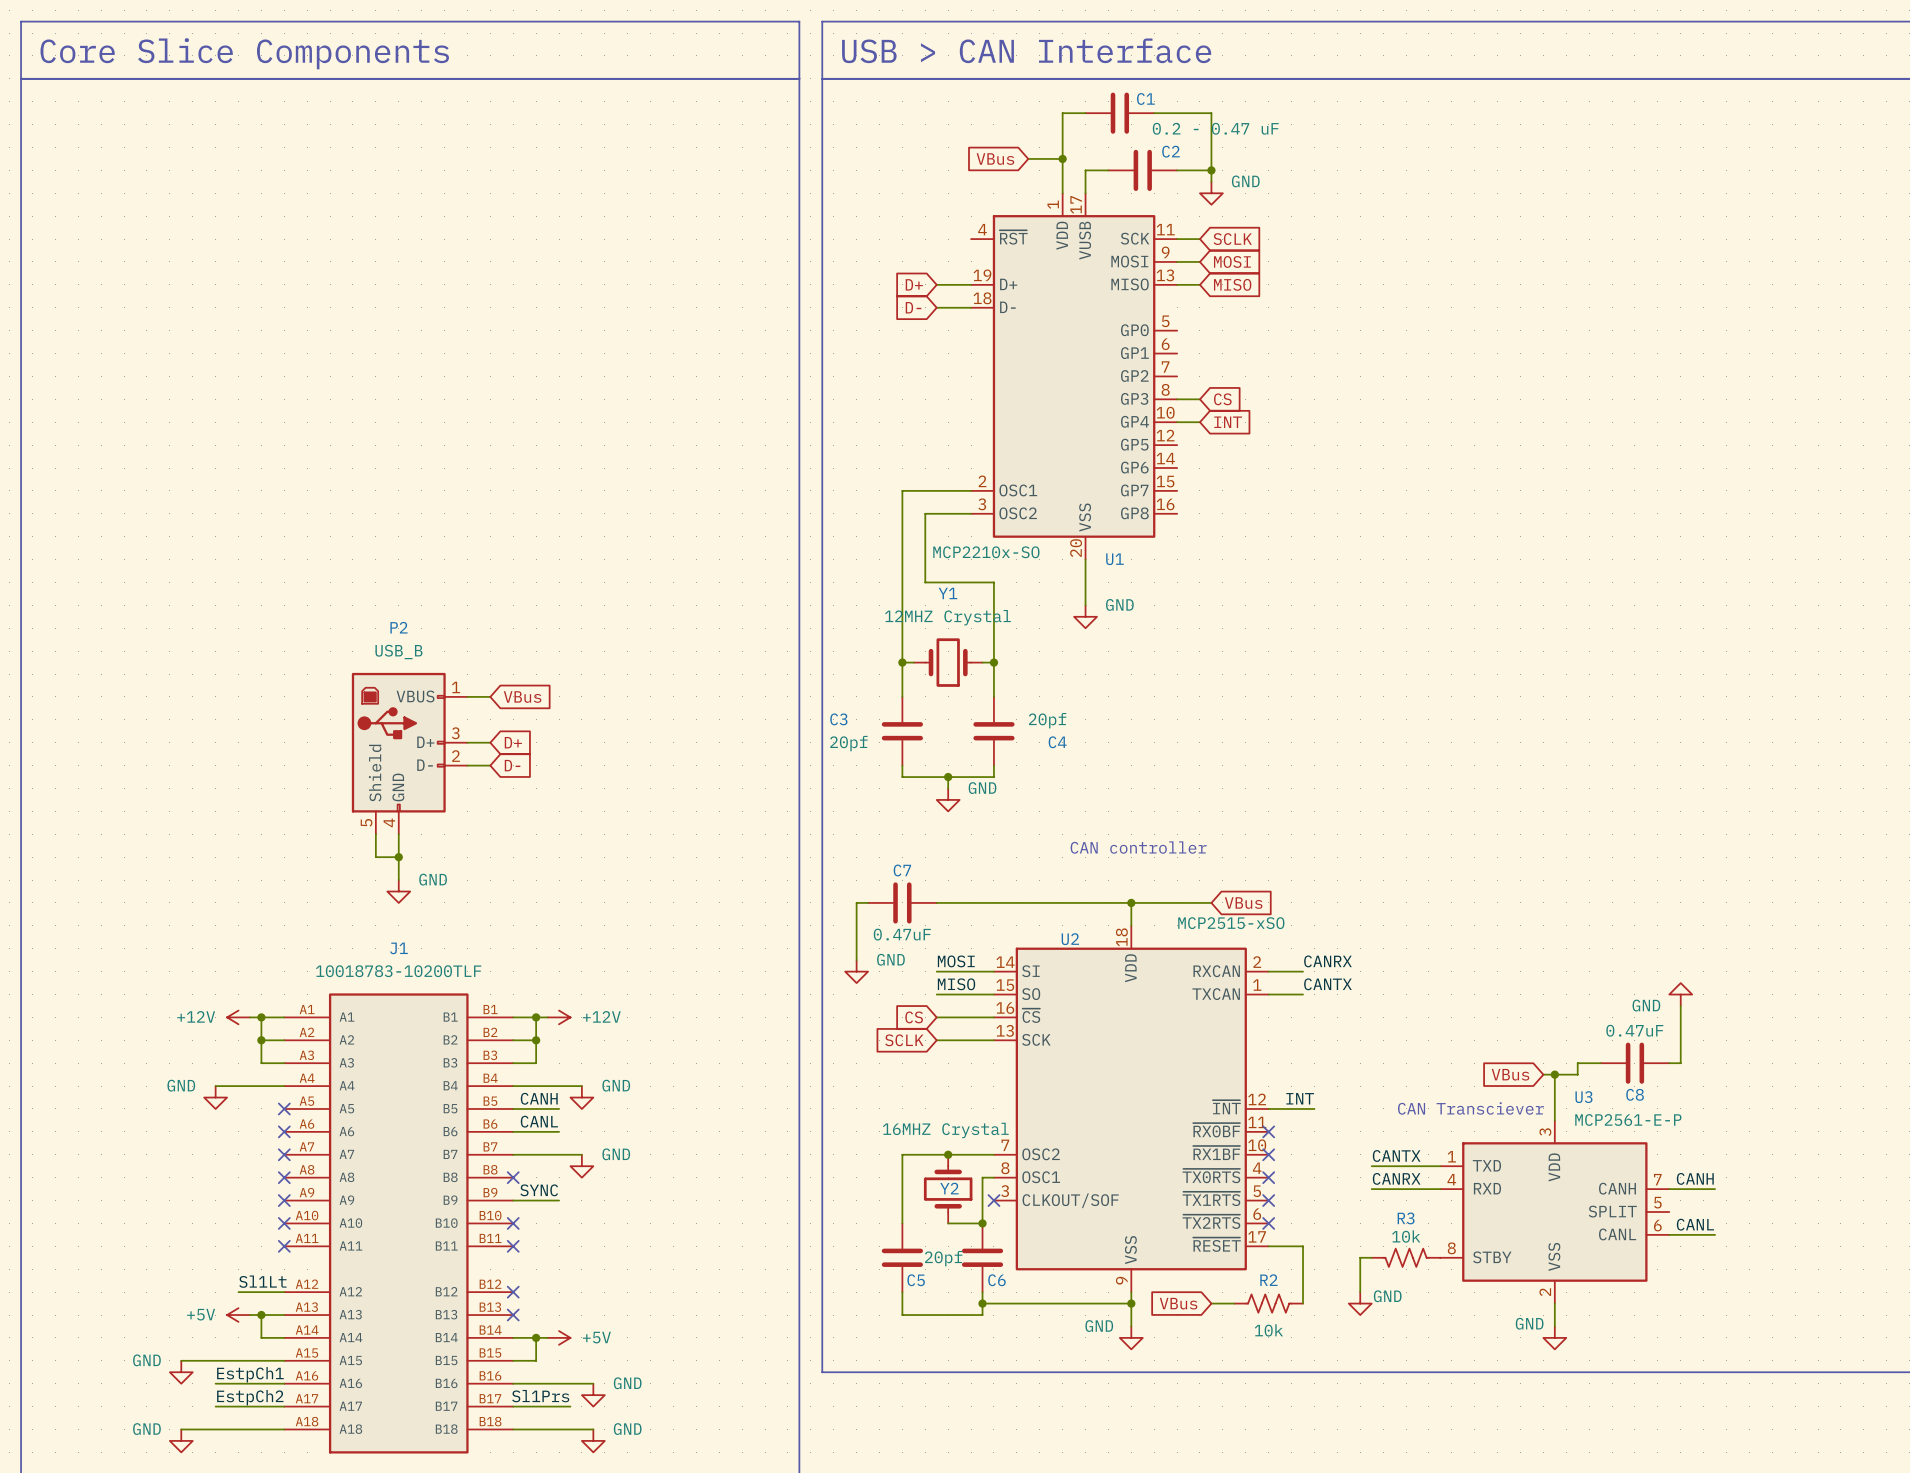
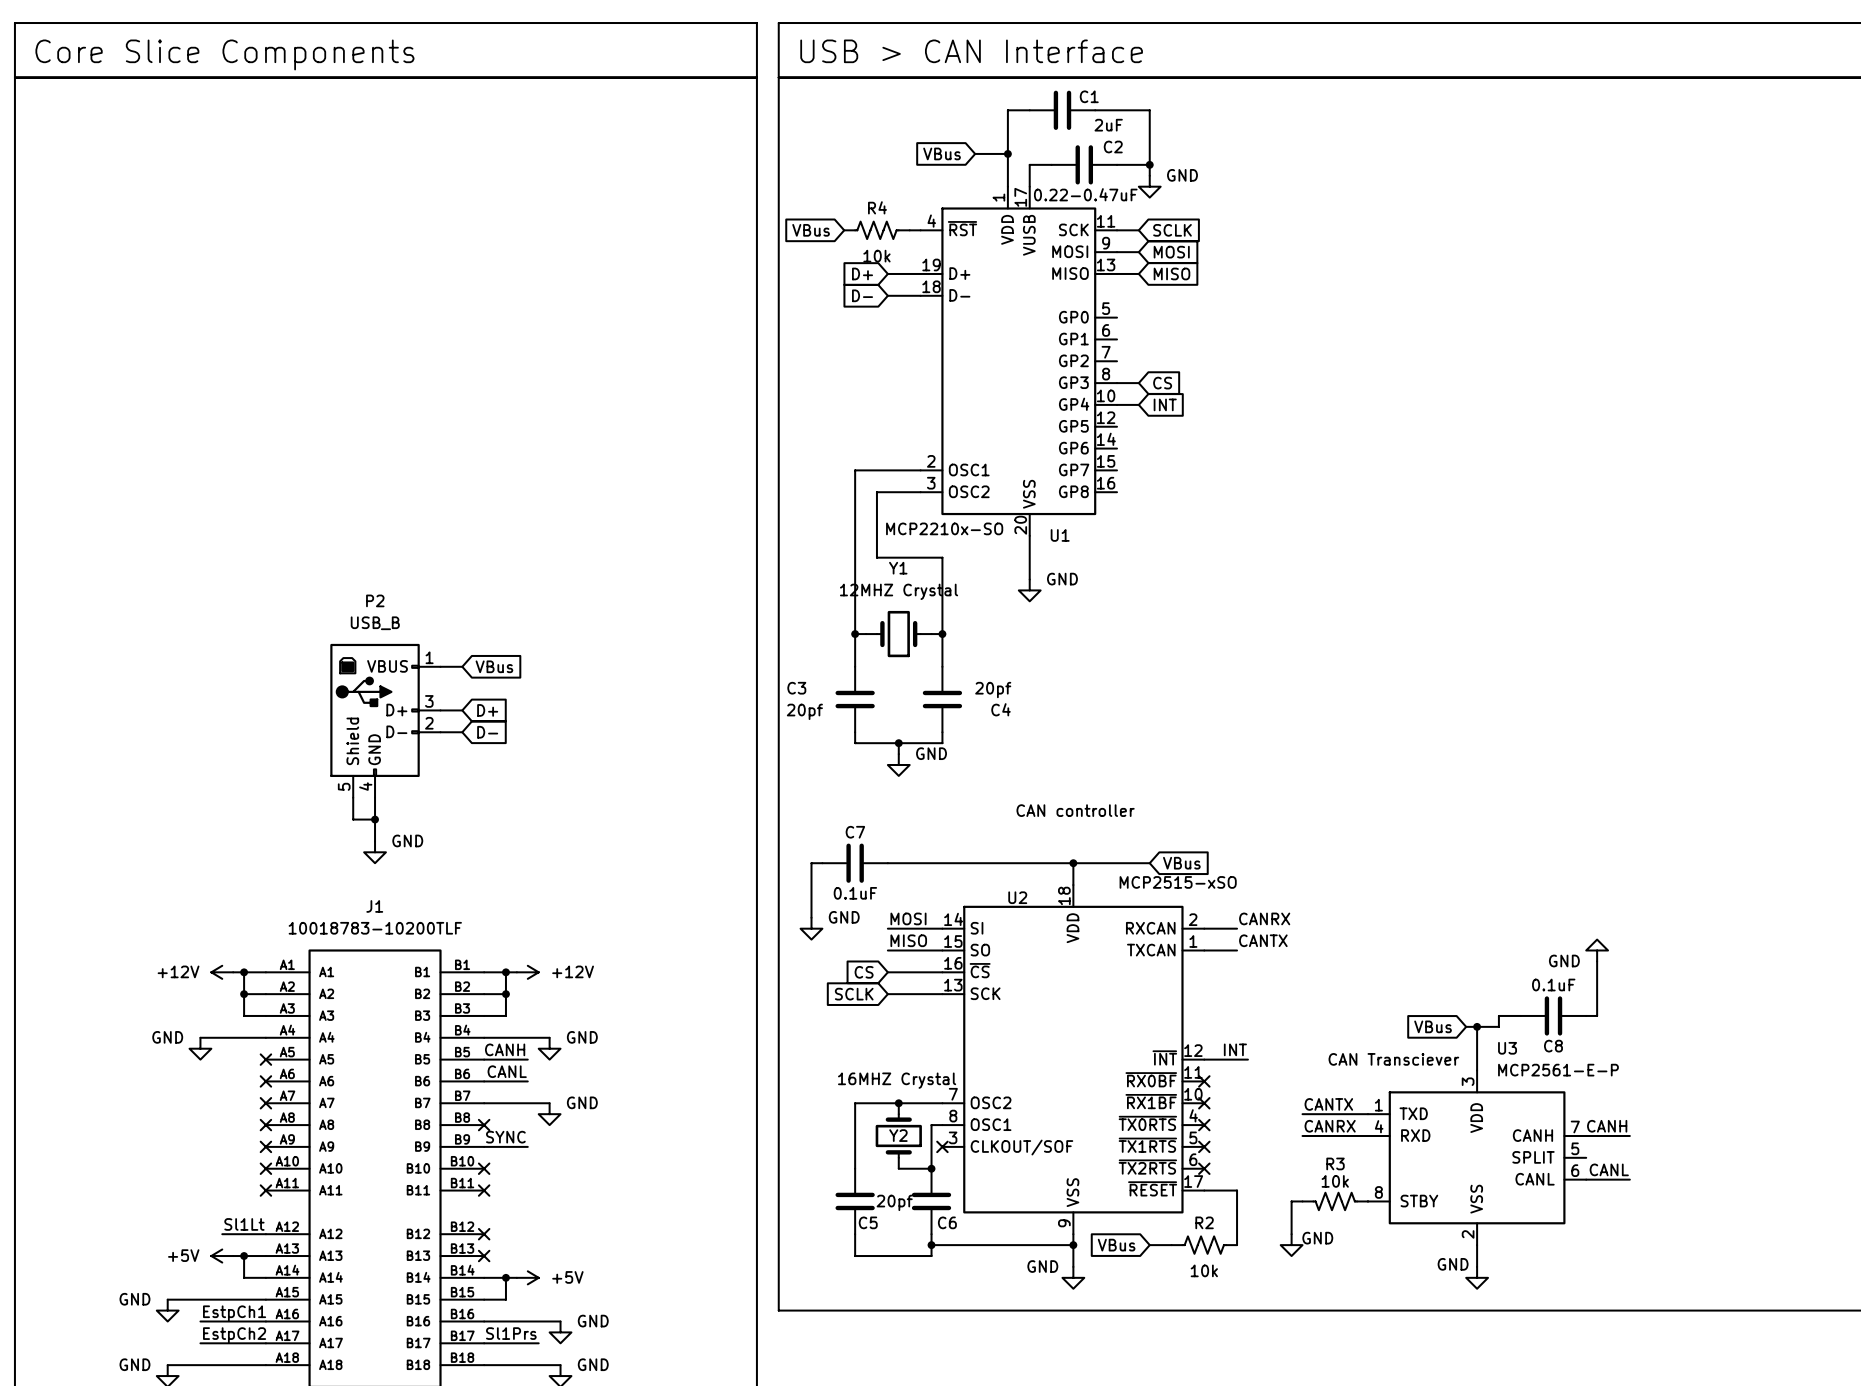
C1 value: 0.2 - 0.47 uF (1215, 128) -> 2uF (1108, 125)
C2 value: none -> 0.22-0.47uF (1085, 194)
global label: none -> VBus (811, 230)
R4: none -> 10k (876, 230)
wire: none -> (909, 230) (920, 230)
C7 value: 0.47uF (902, 934) -> 0.1uF (855, 893)
C8 value: 0.47uF (1634, 1030) -> 0.1uF (1553, 985)

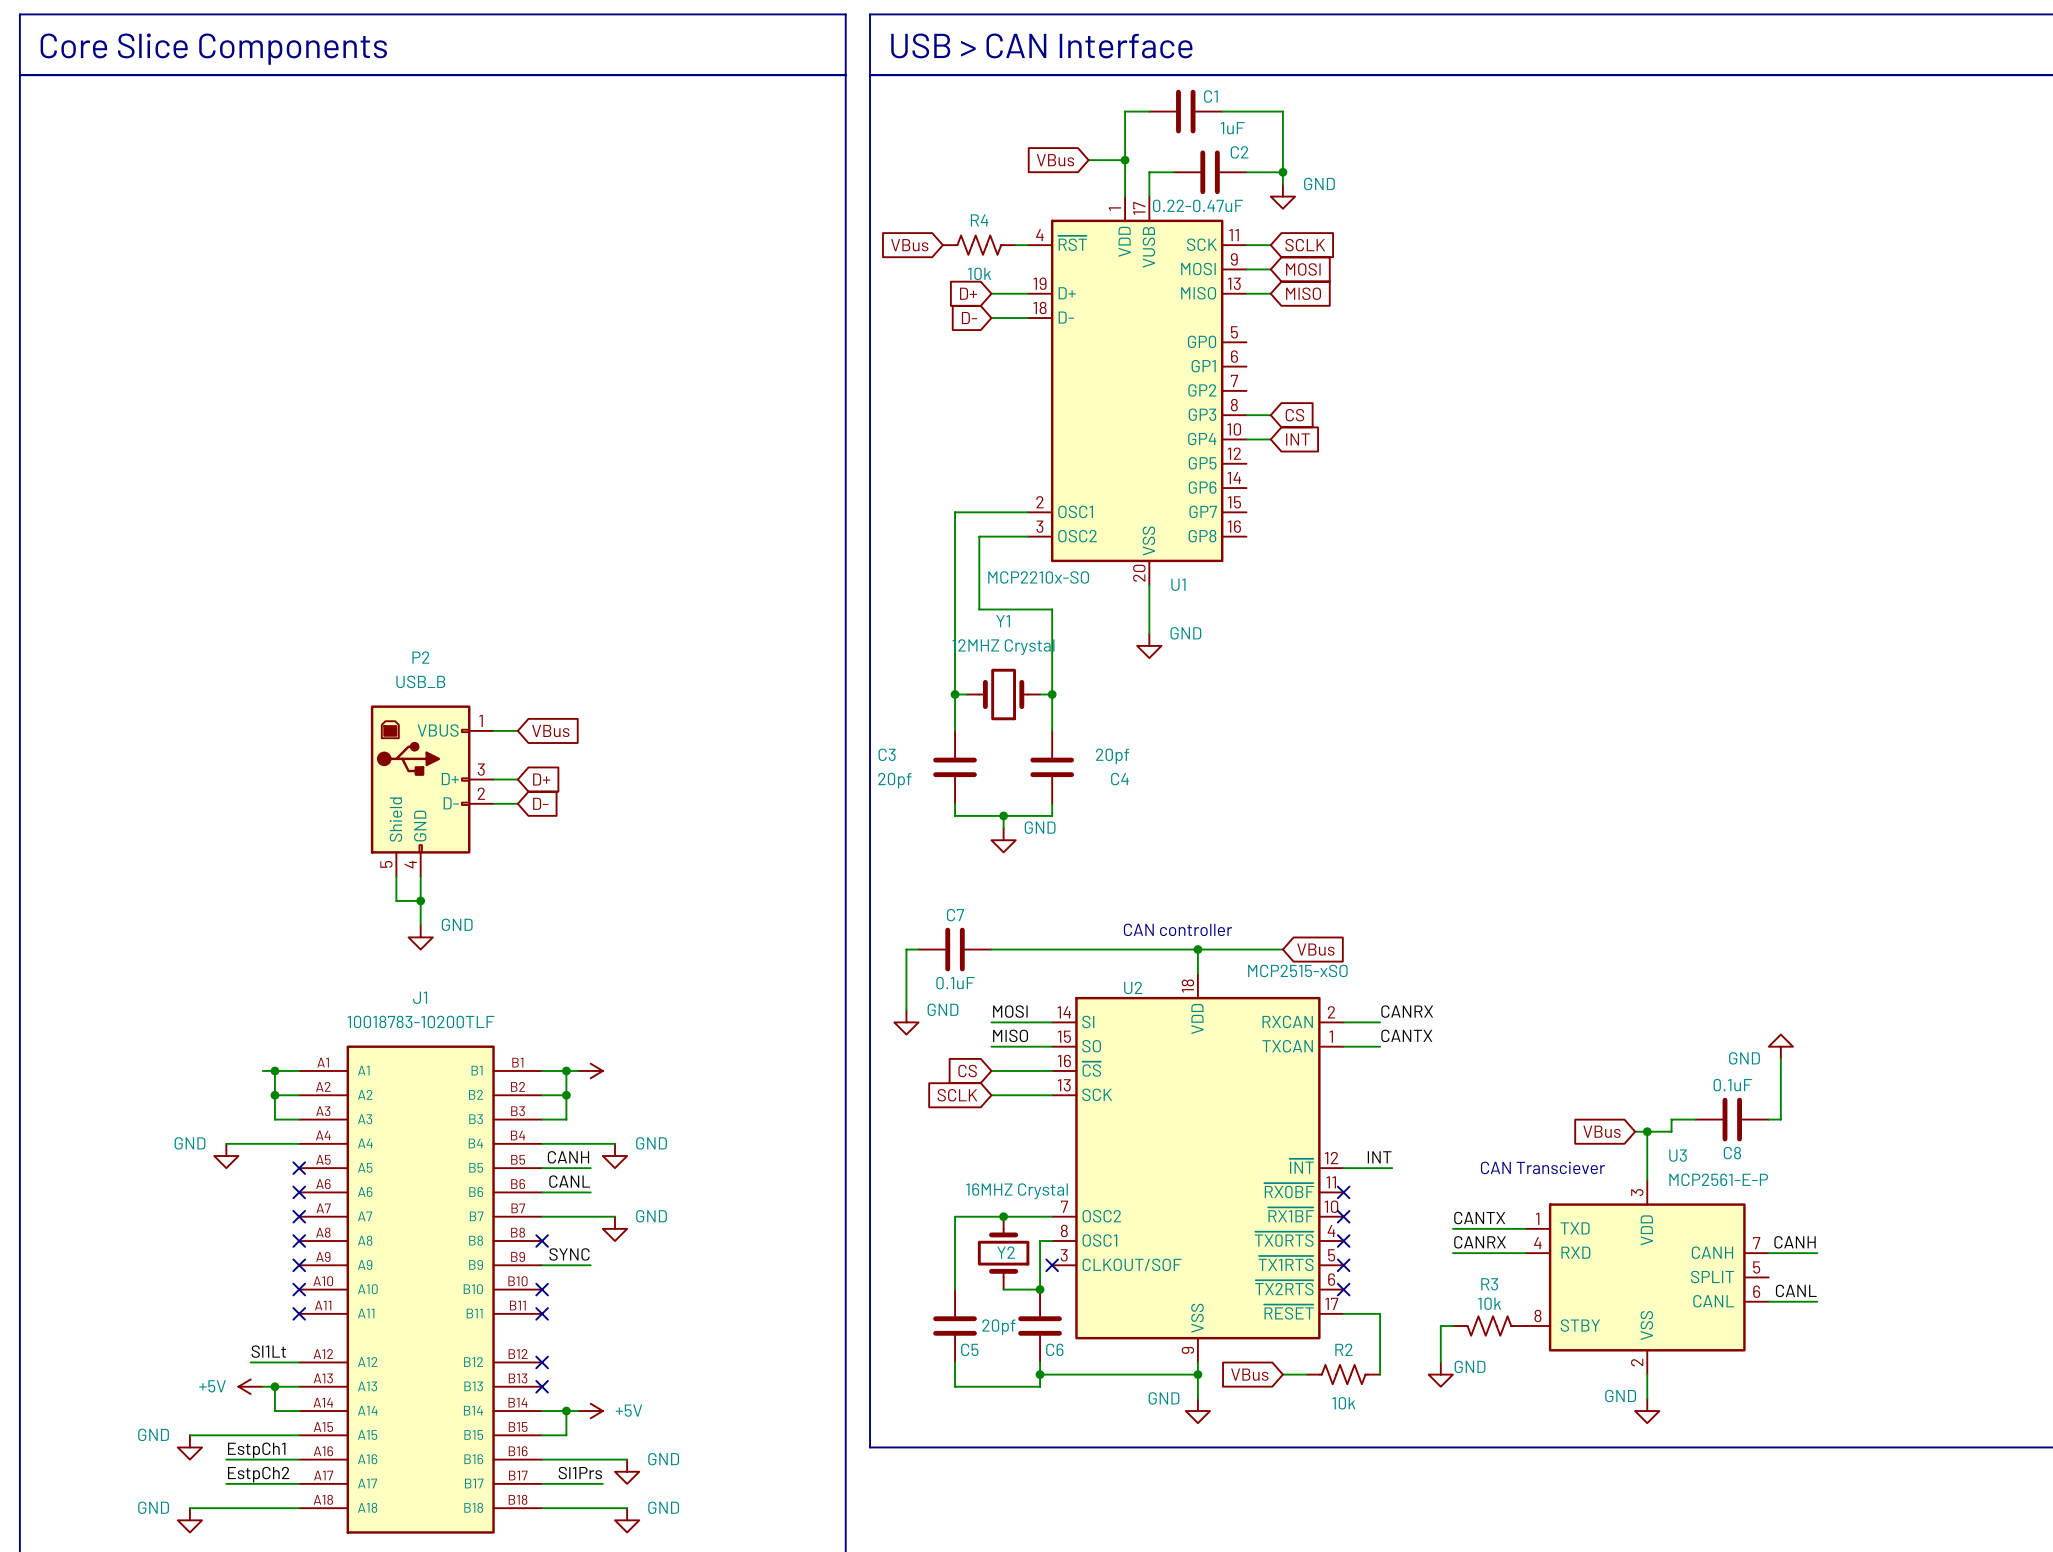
C1 value: 2uF (1108, 125) -> 1uF (1232, 128)
text position: CAN controller (1075, 810) -> CAN controller (1177, 929)
power symbol text: +12V (573, 971) -> none
power symbol: +12V (222, 972) -> none

